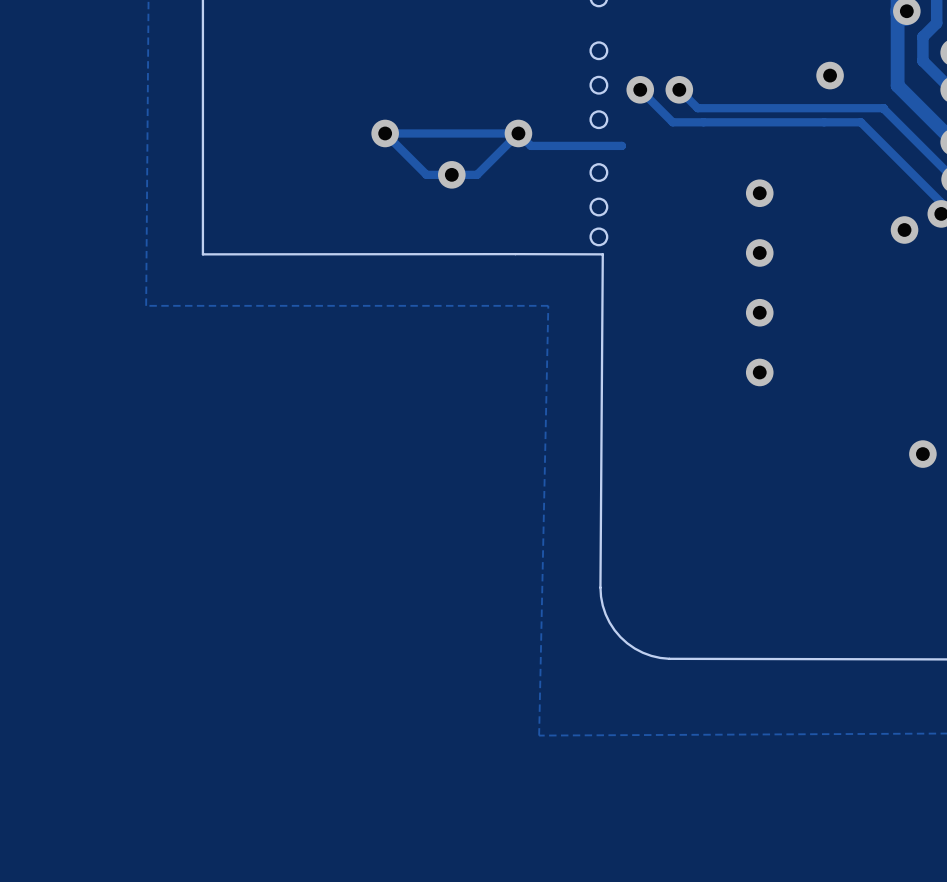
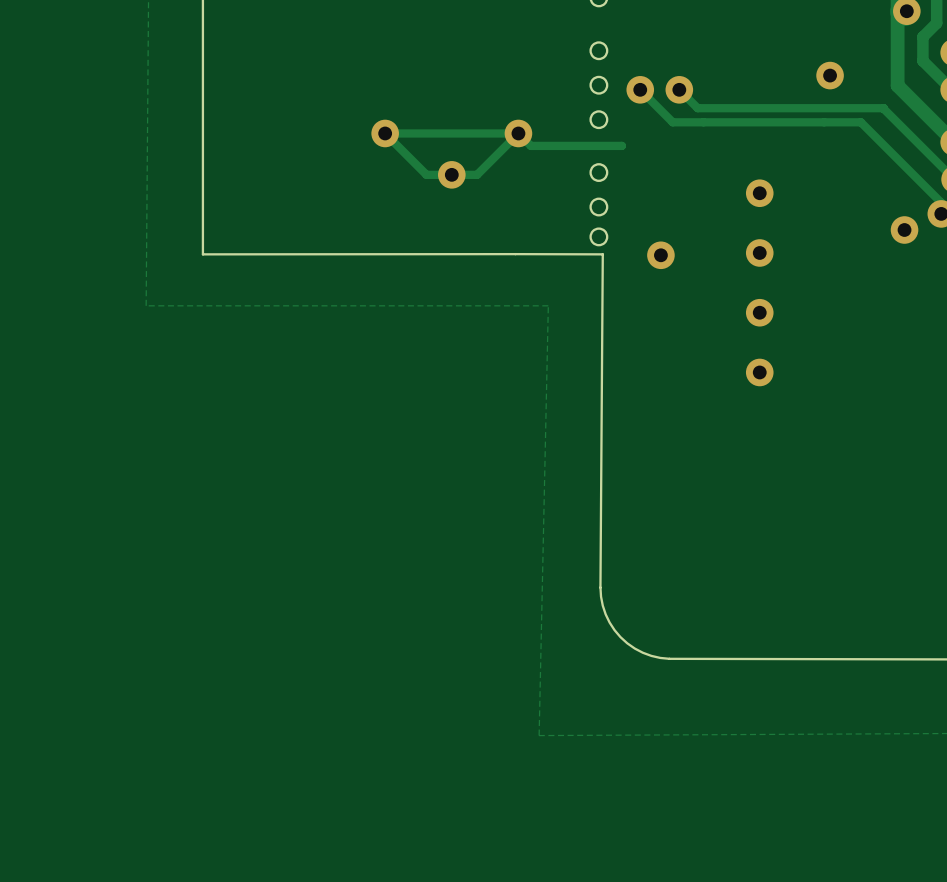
via: none -> (660, 255)
via: (922, 454) -> none

